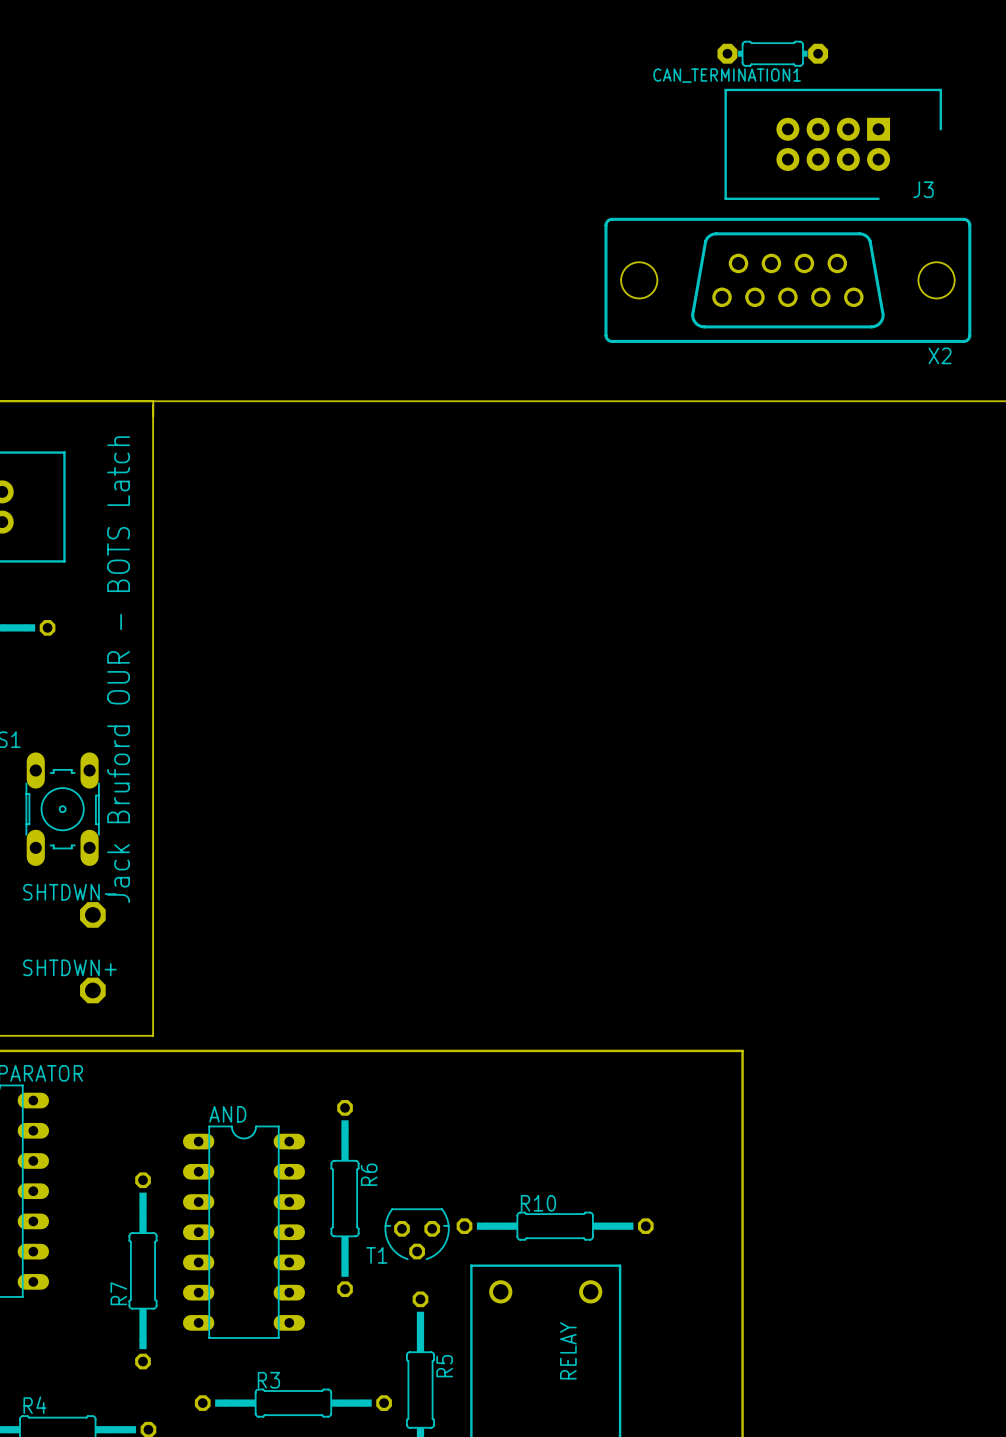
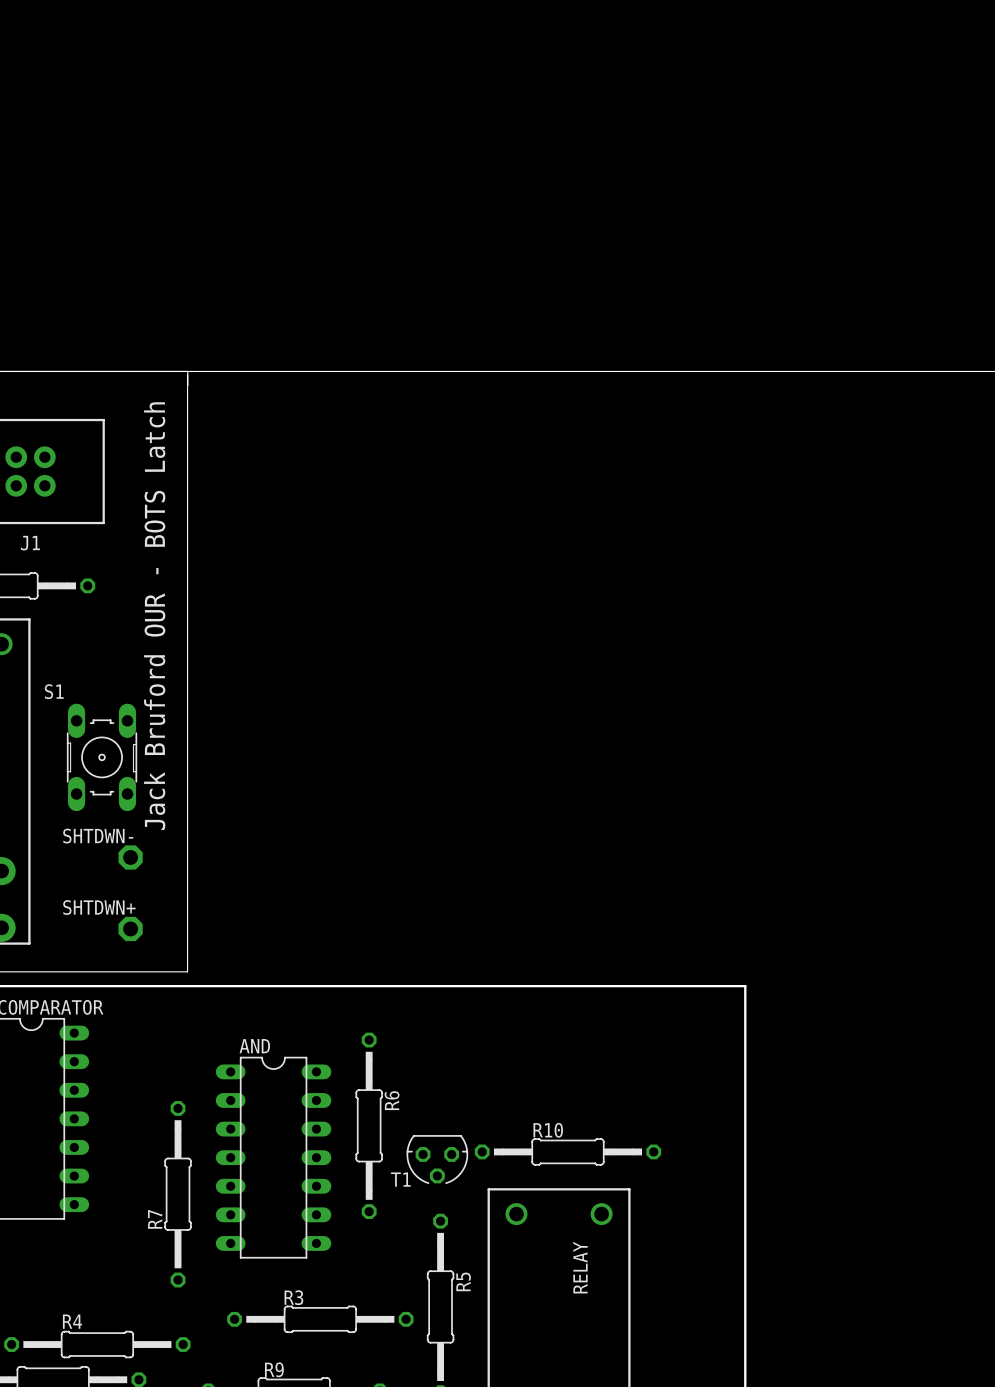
CAN_TERMINATION1: (772, 53) -> none
J3: (833, 144) -> none
X2: (787, 280) -> none

